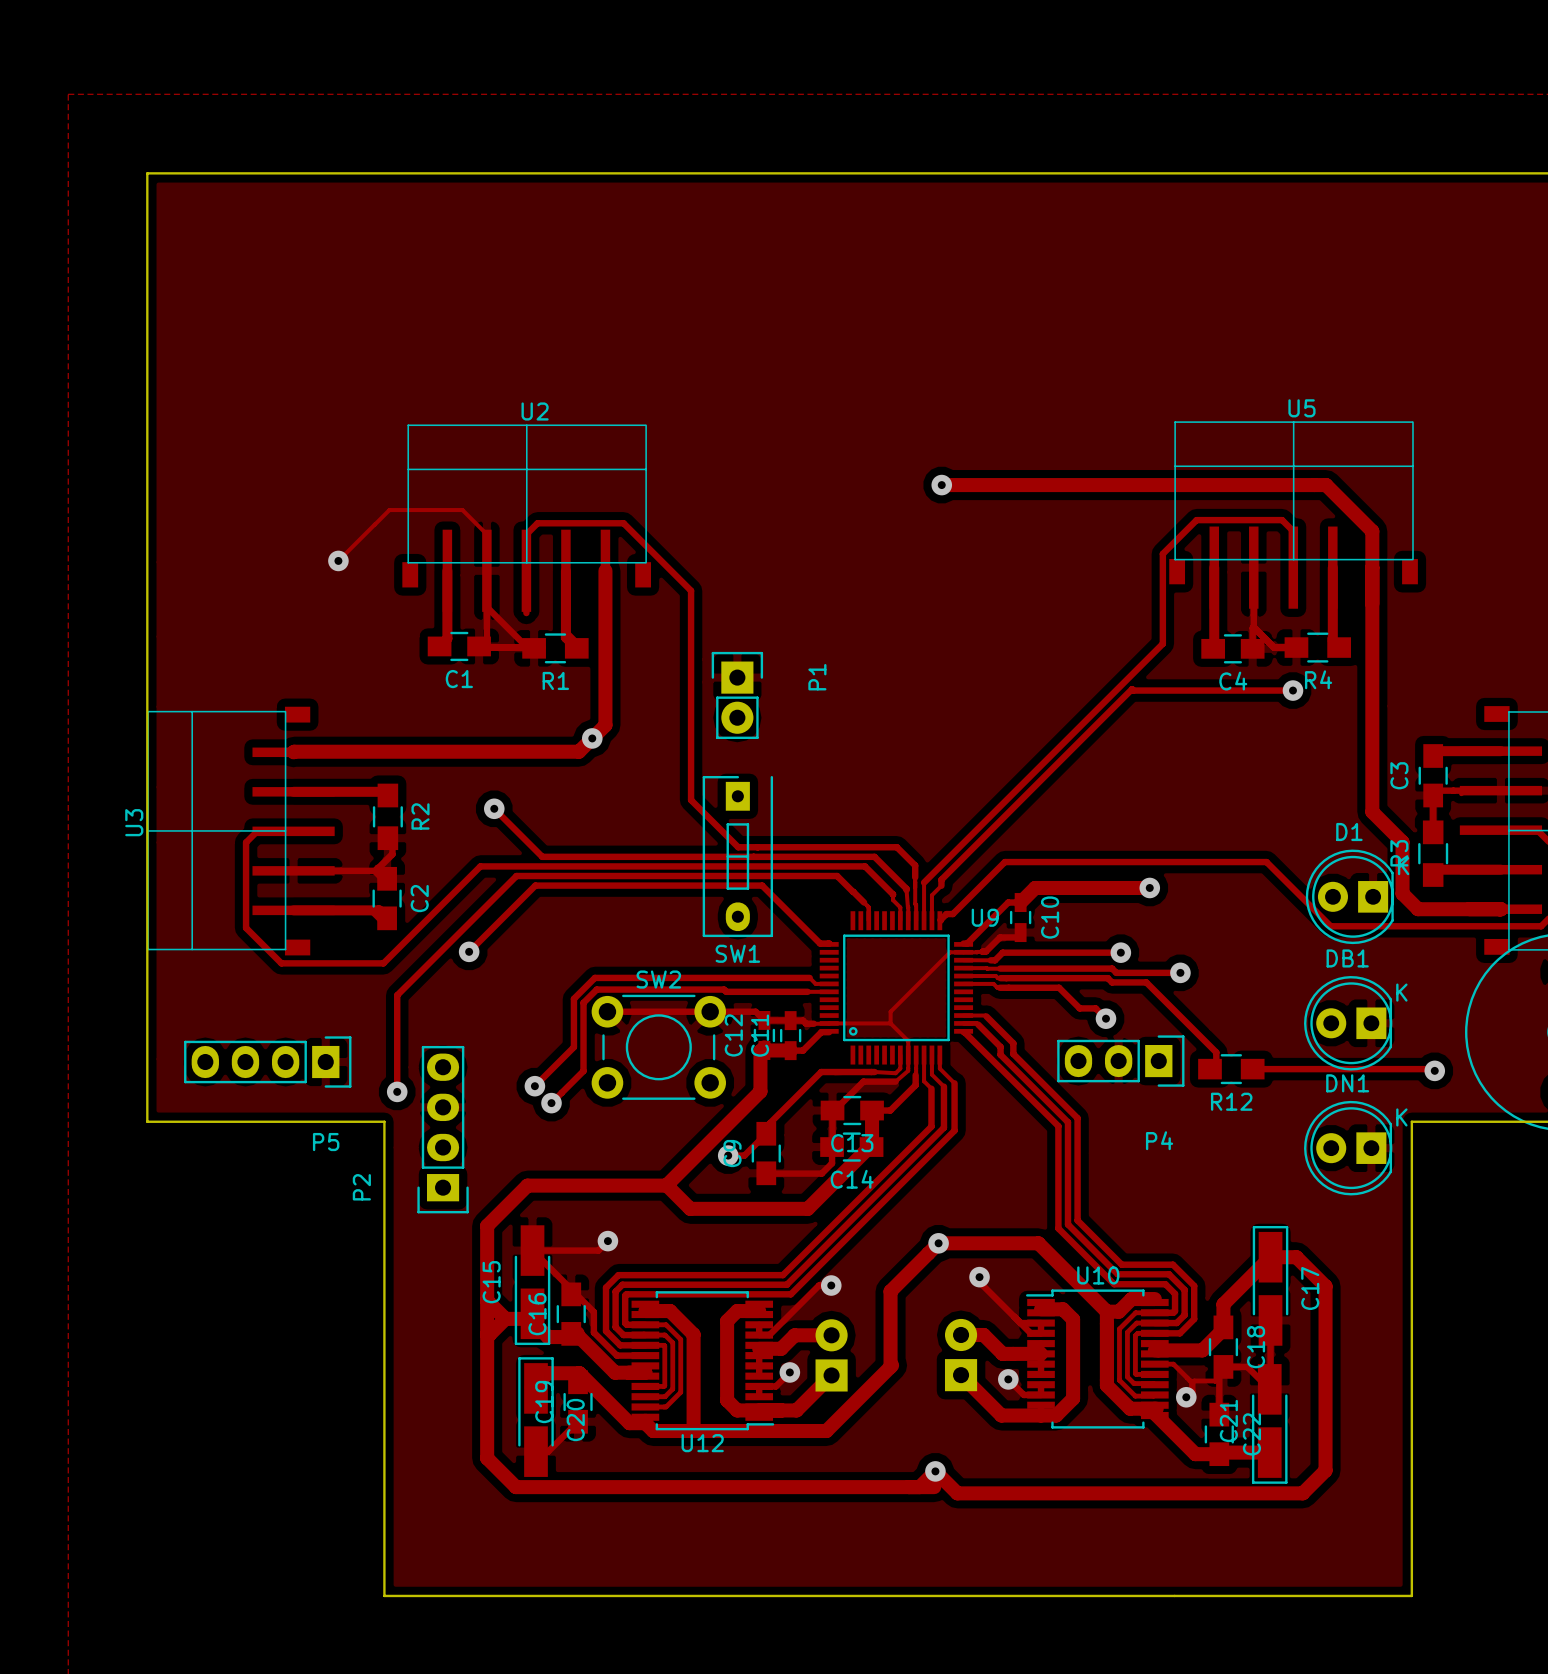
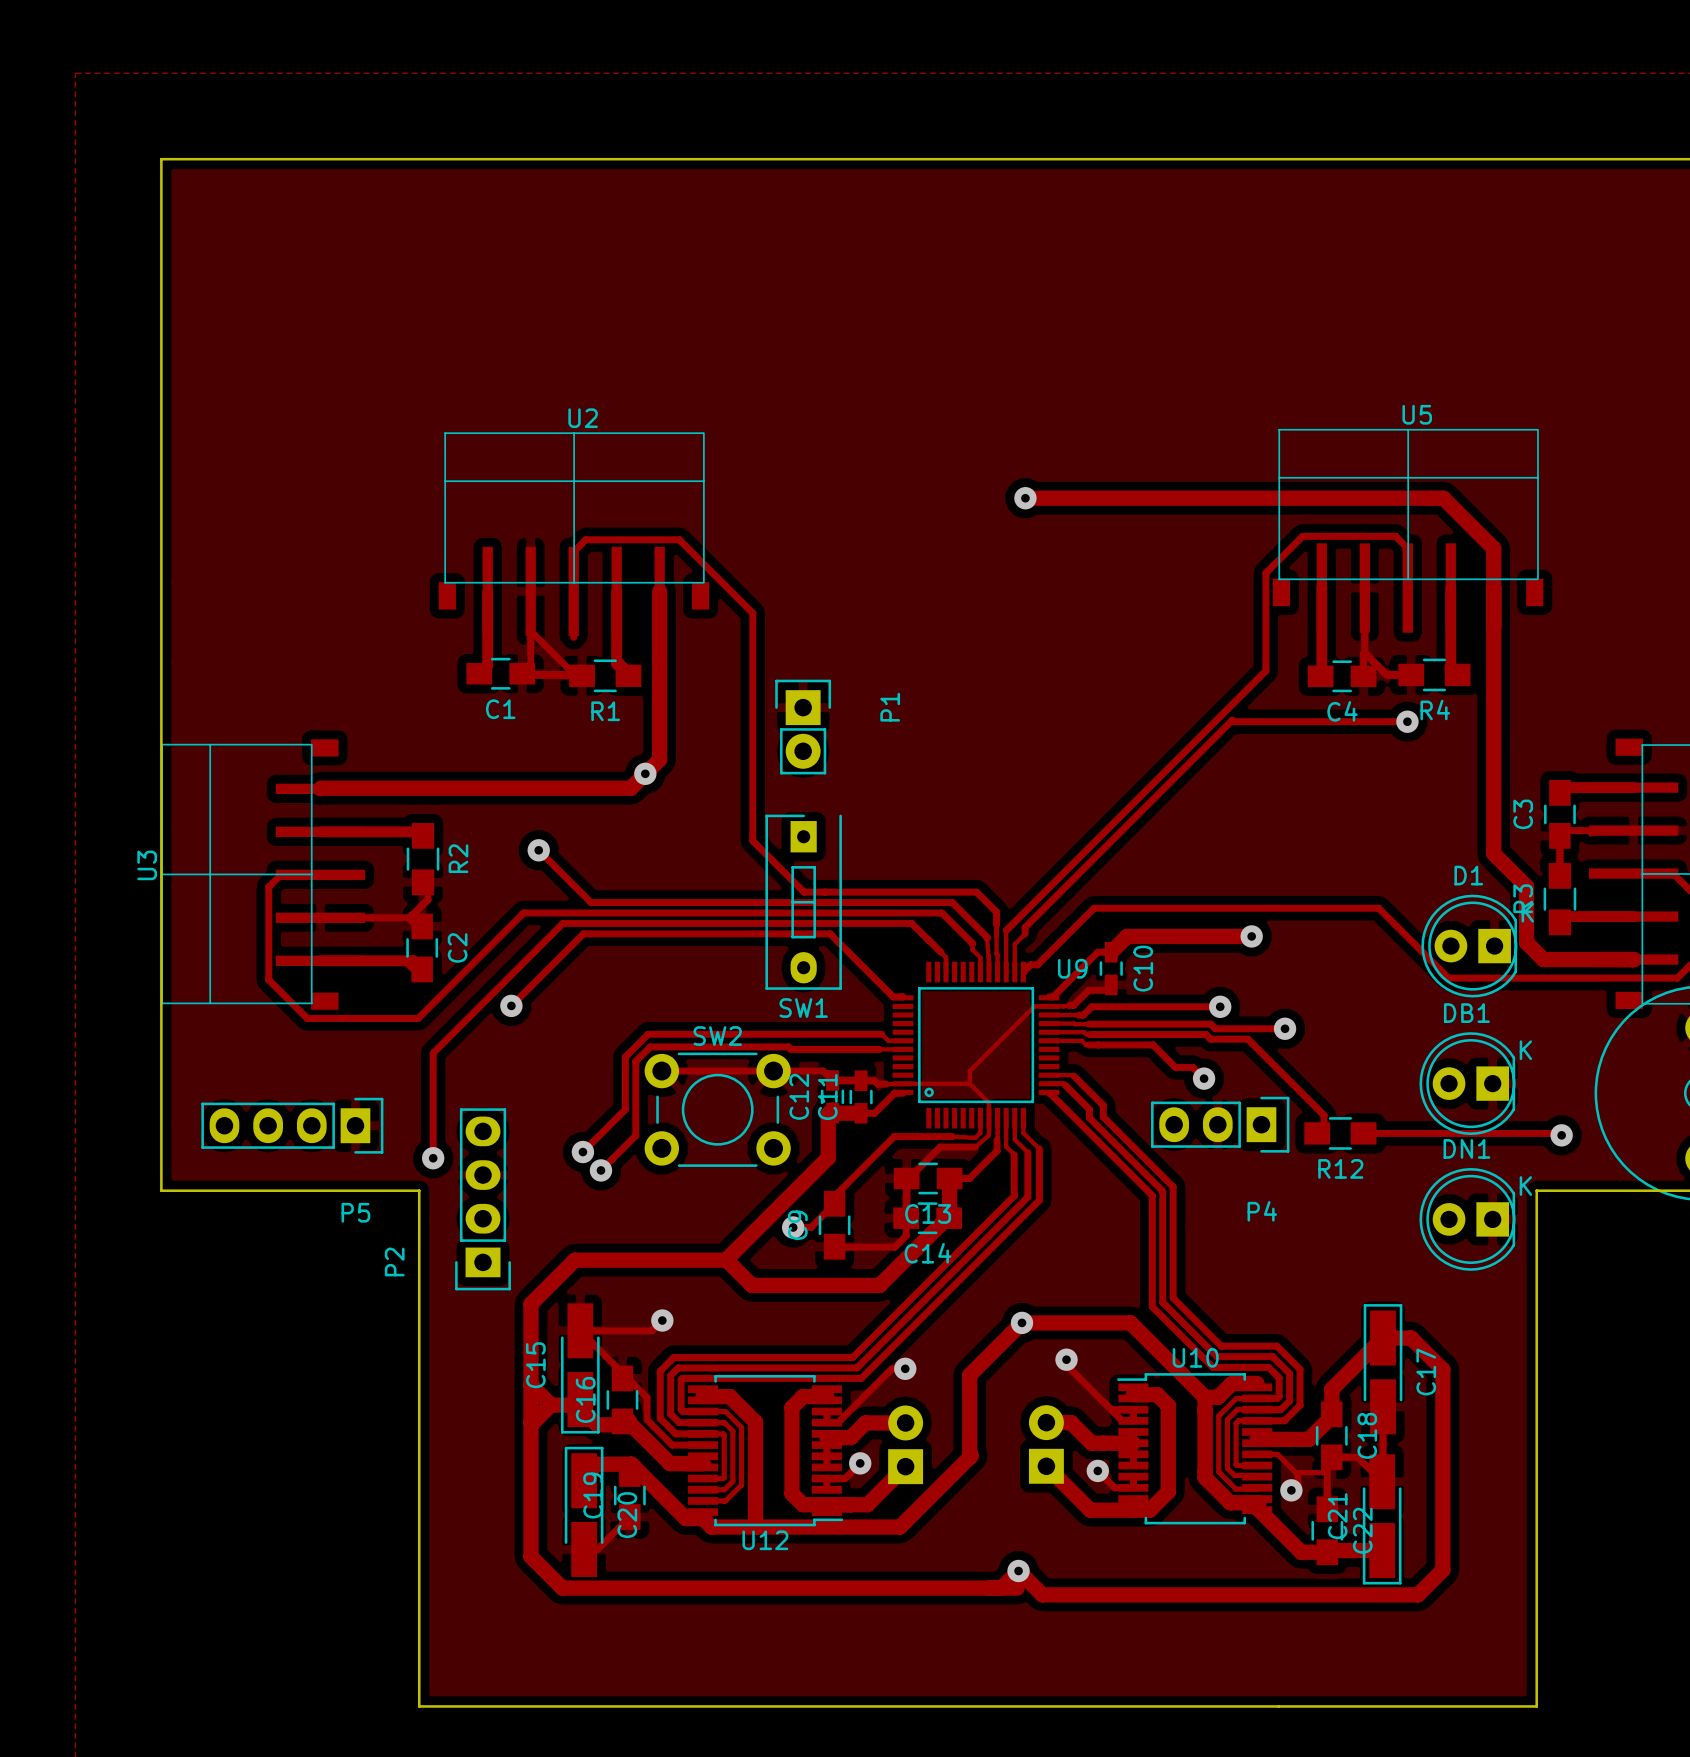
track: (374, 524) (338, 560) -> none
track: (374, 524) (389, 510) (462, 510) (486, 534) (486, 570) -> none
via: (338, 560) -> none

